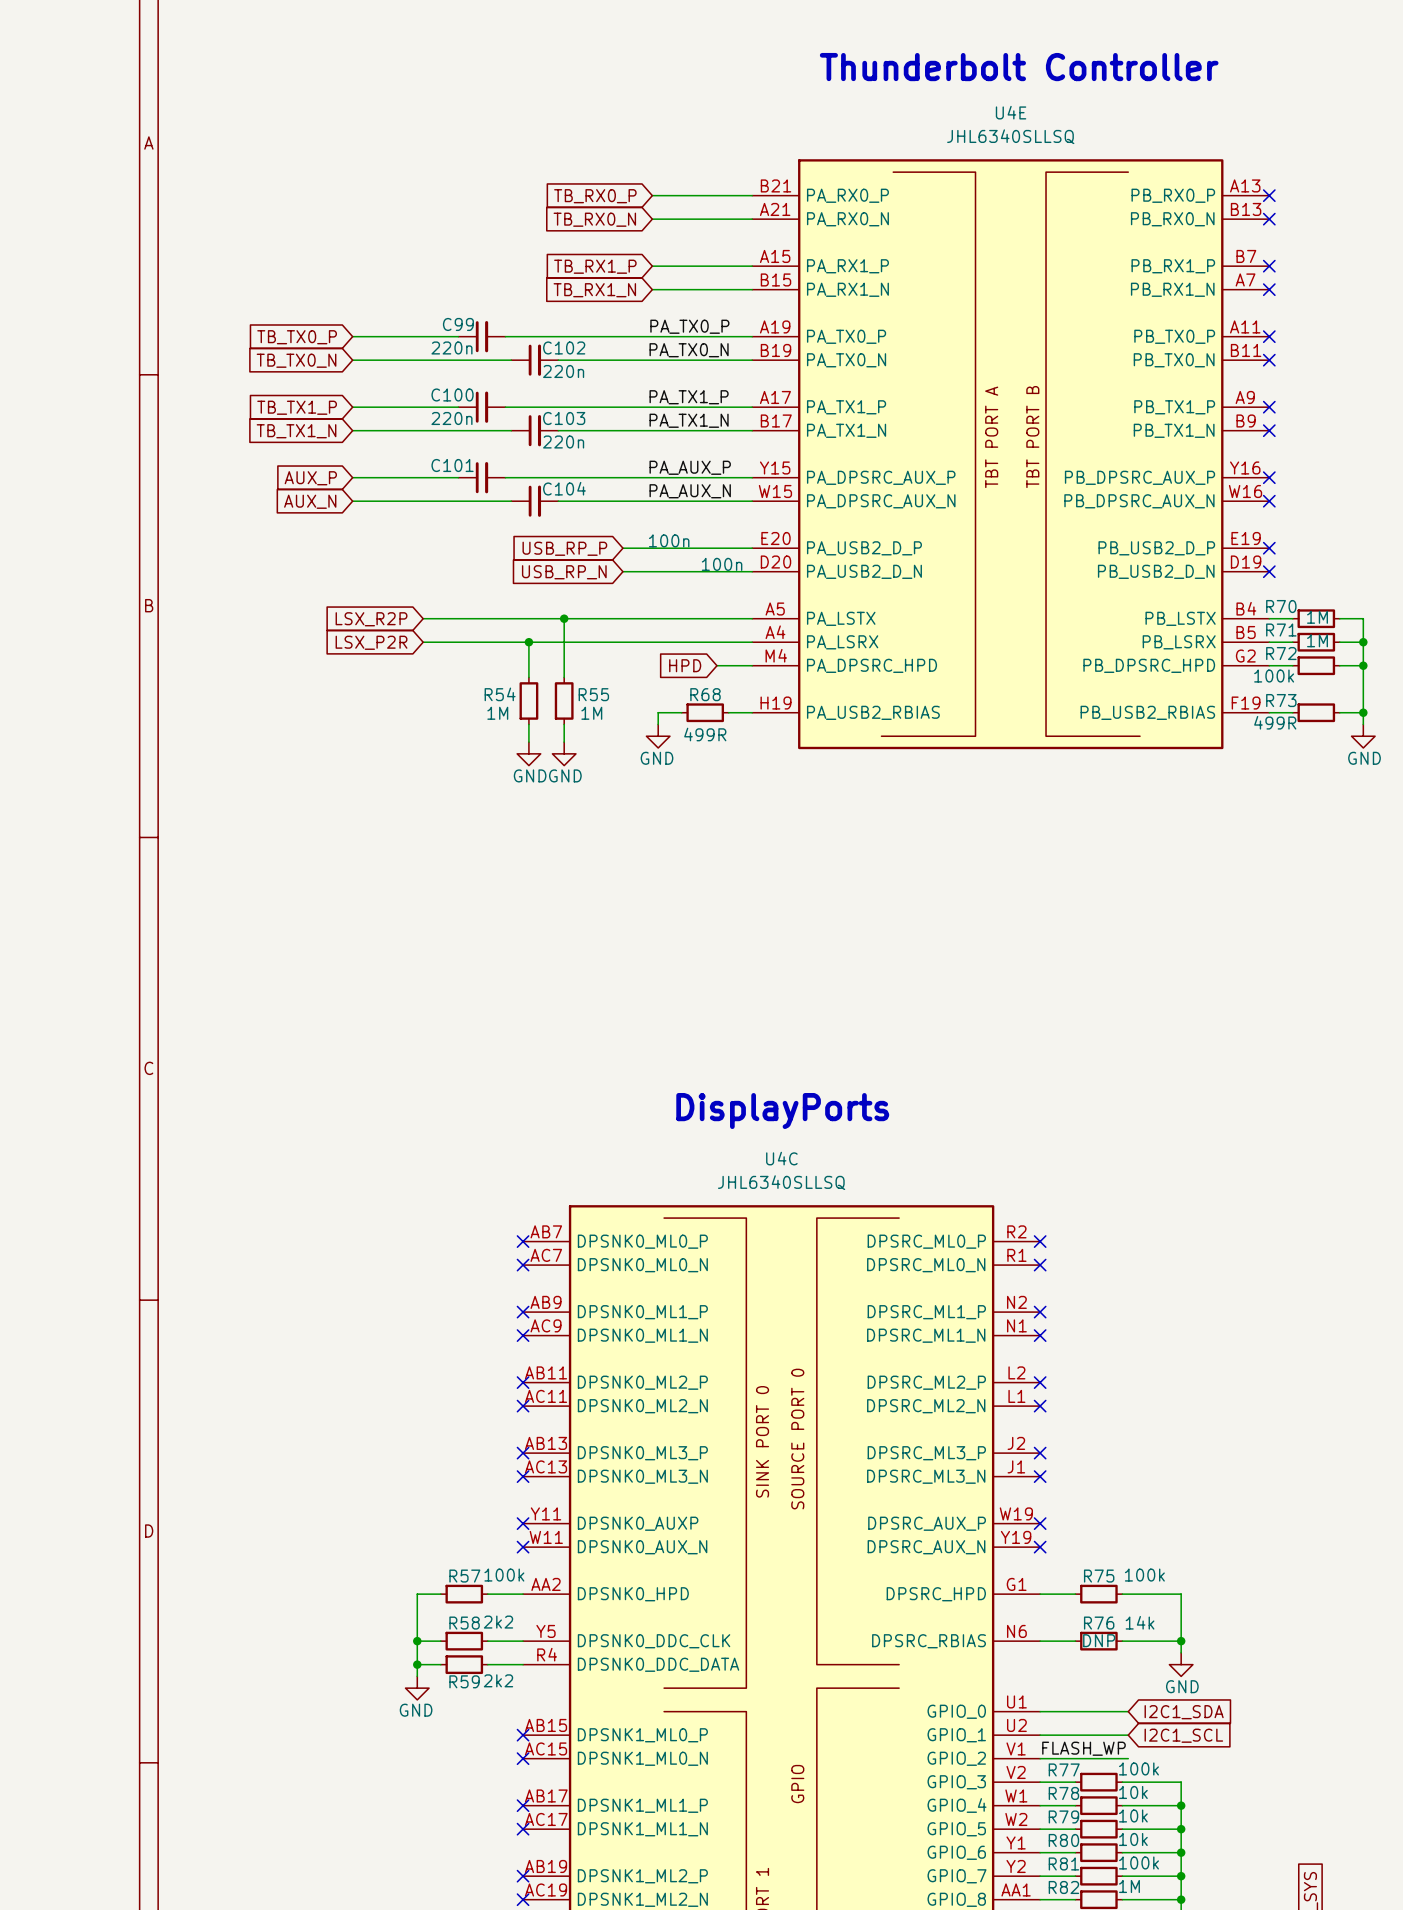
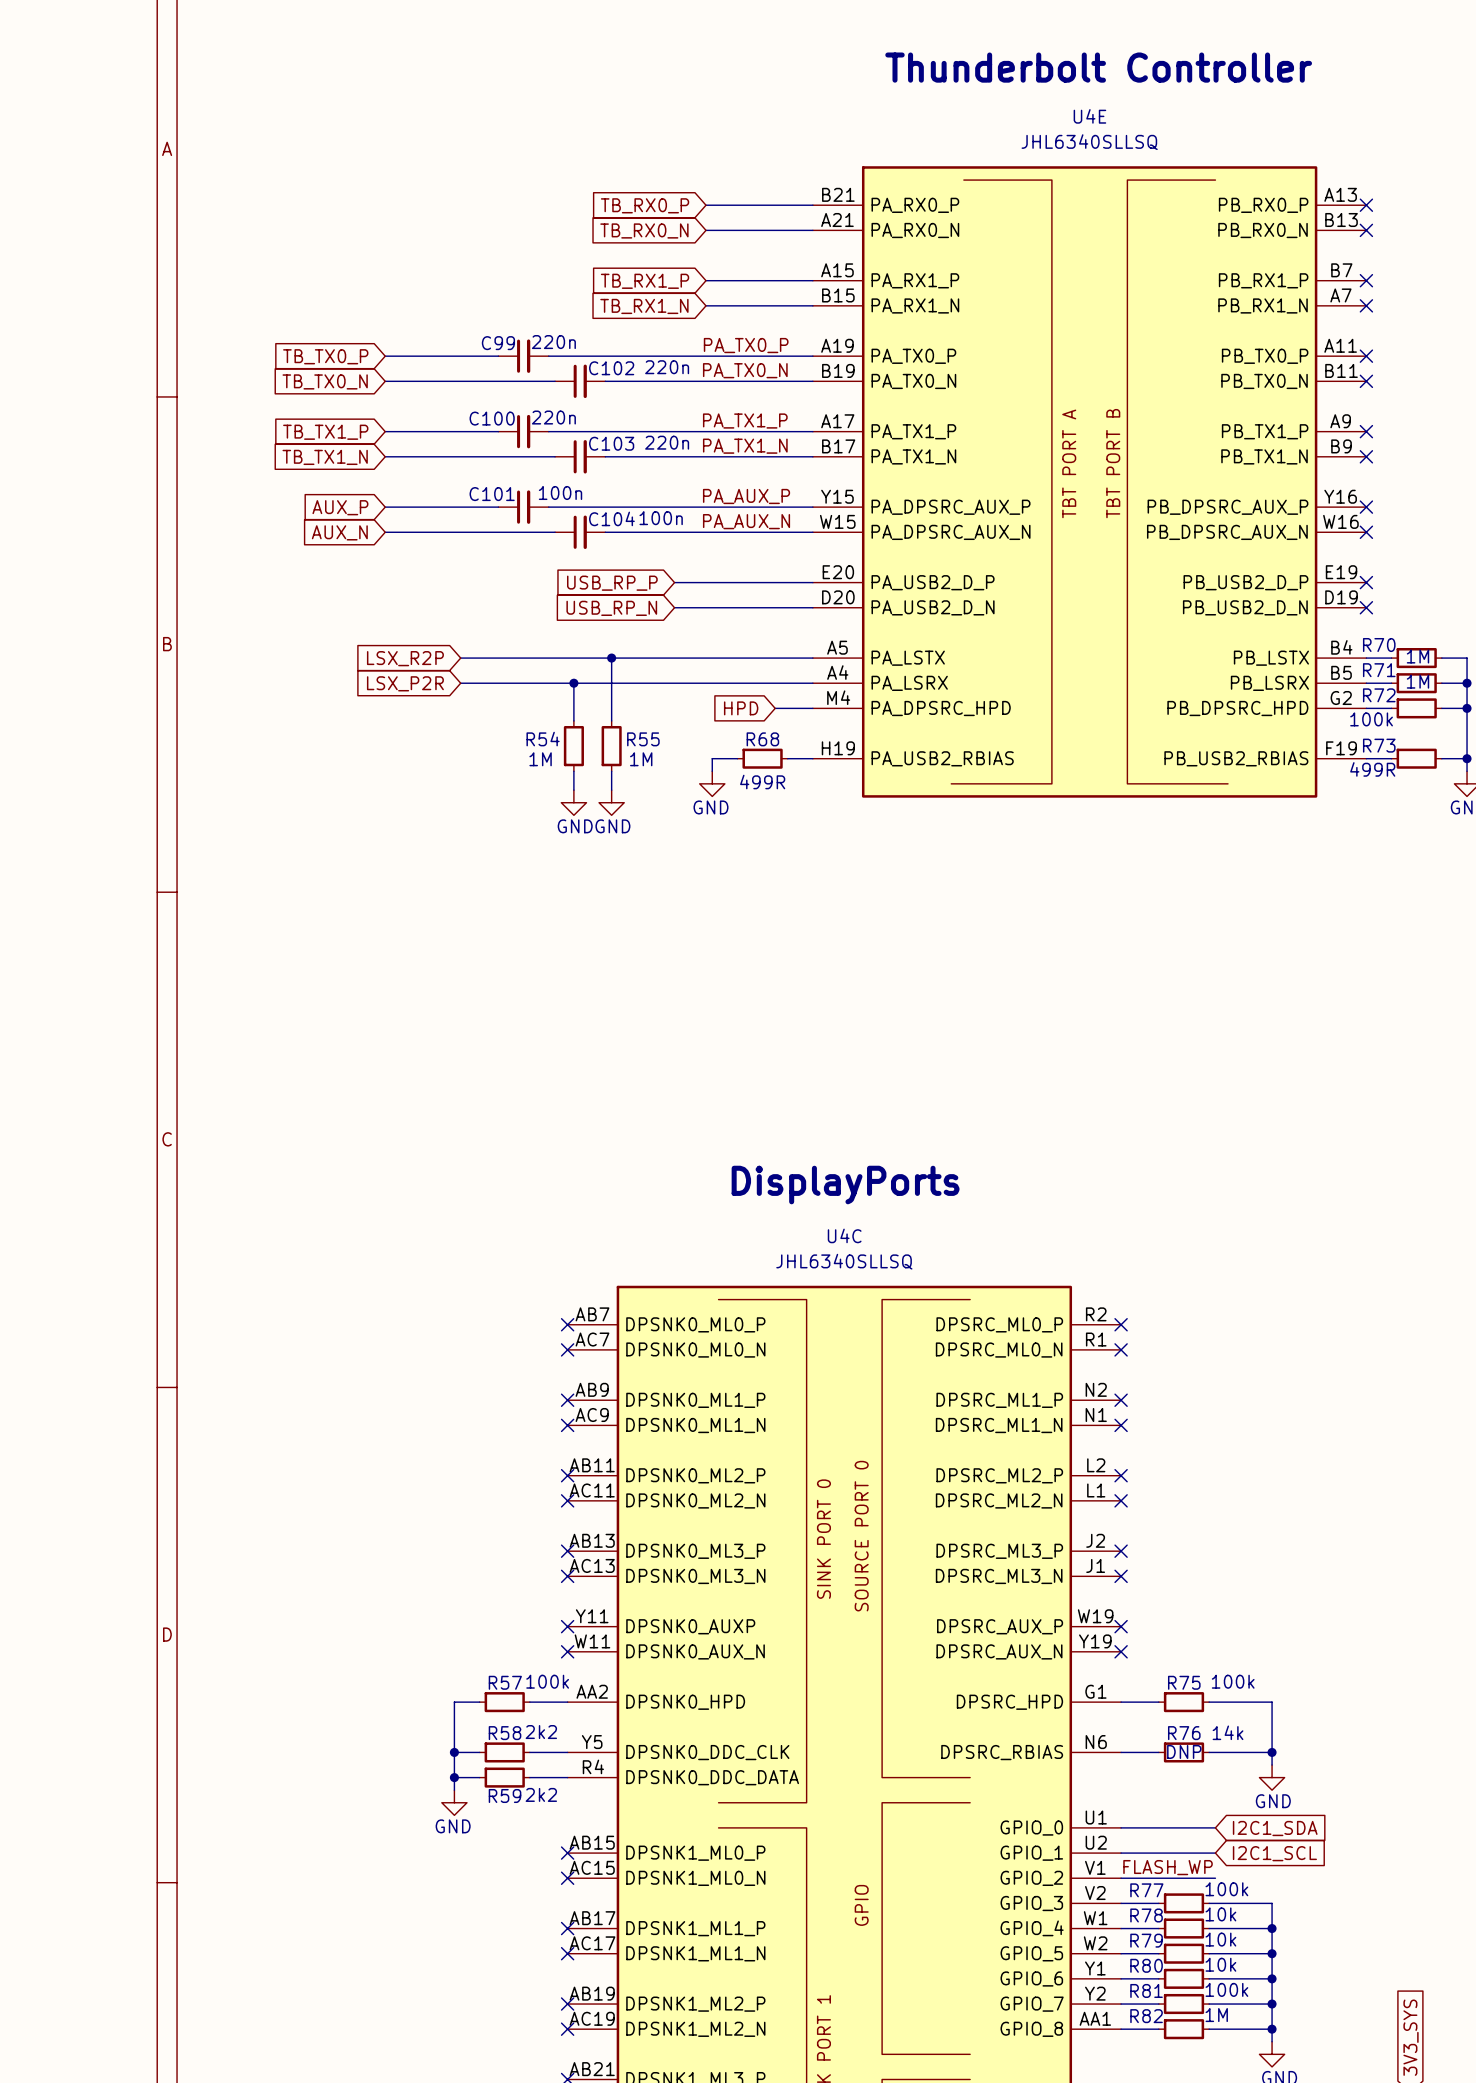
C99 text position: 220n (451, 347) -> 220n (553, 342)
C102 text position: 220n (563, 371) -> 220n (667, 367)
C100 text position: 220n (451, 418) -> 220n (553, 417)
C103 text position: 220n (563, 441) -> 220n (667, 442)
C101 text position: 100n (669, 540) -> 100n (560, 492)
C104 text position: 100n (722, 564) -> 100n (661, 518)

